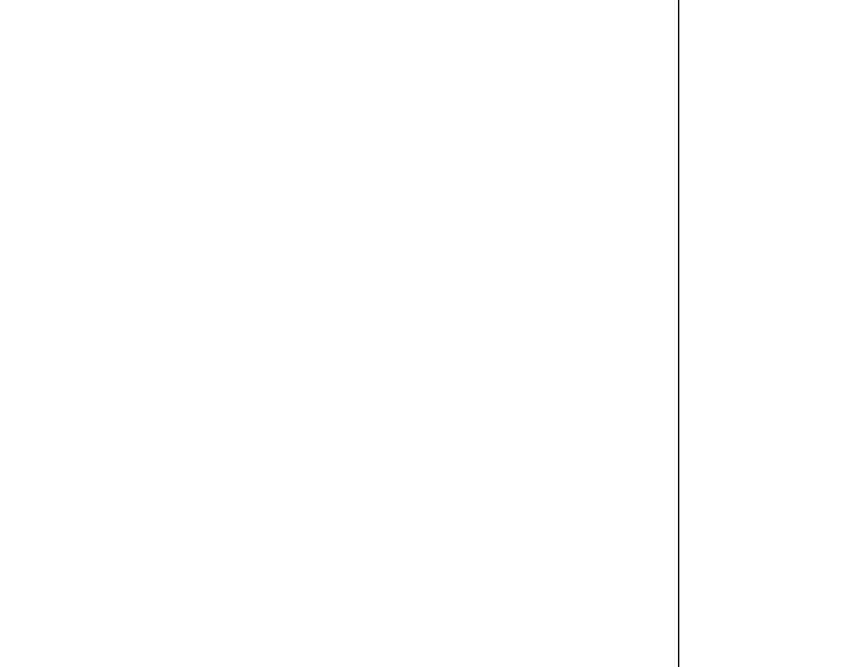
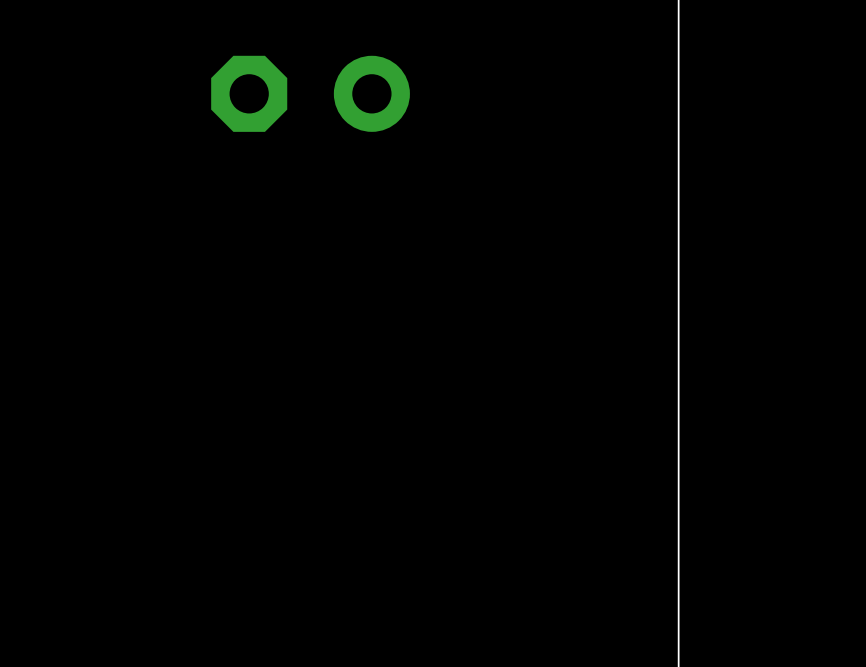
part: none -> (310, 93)

